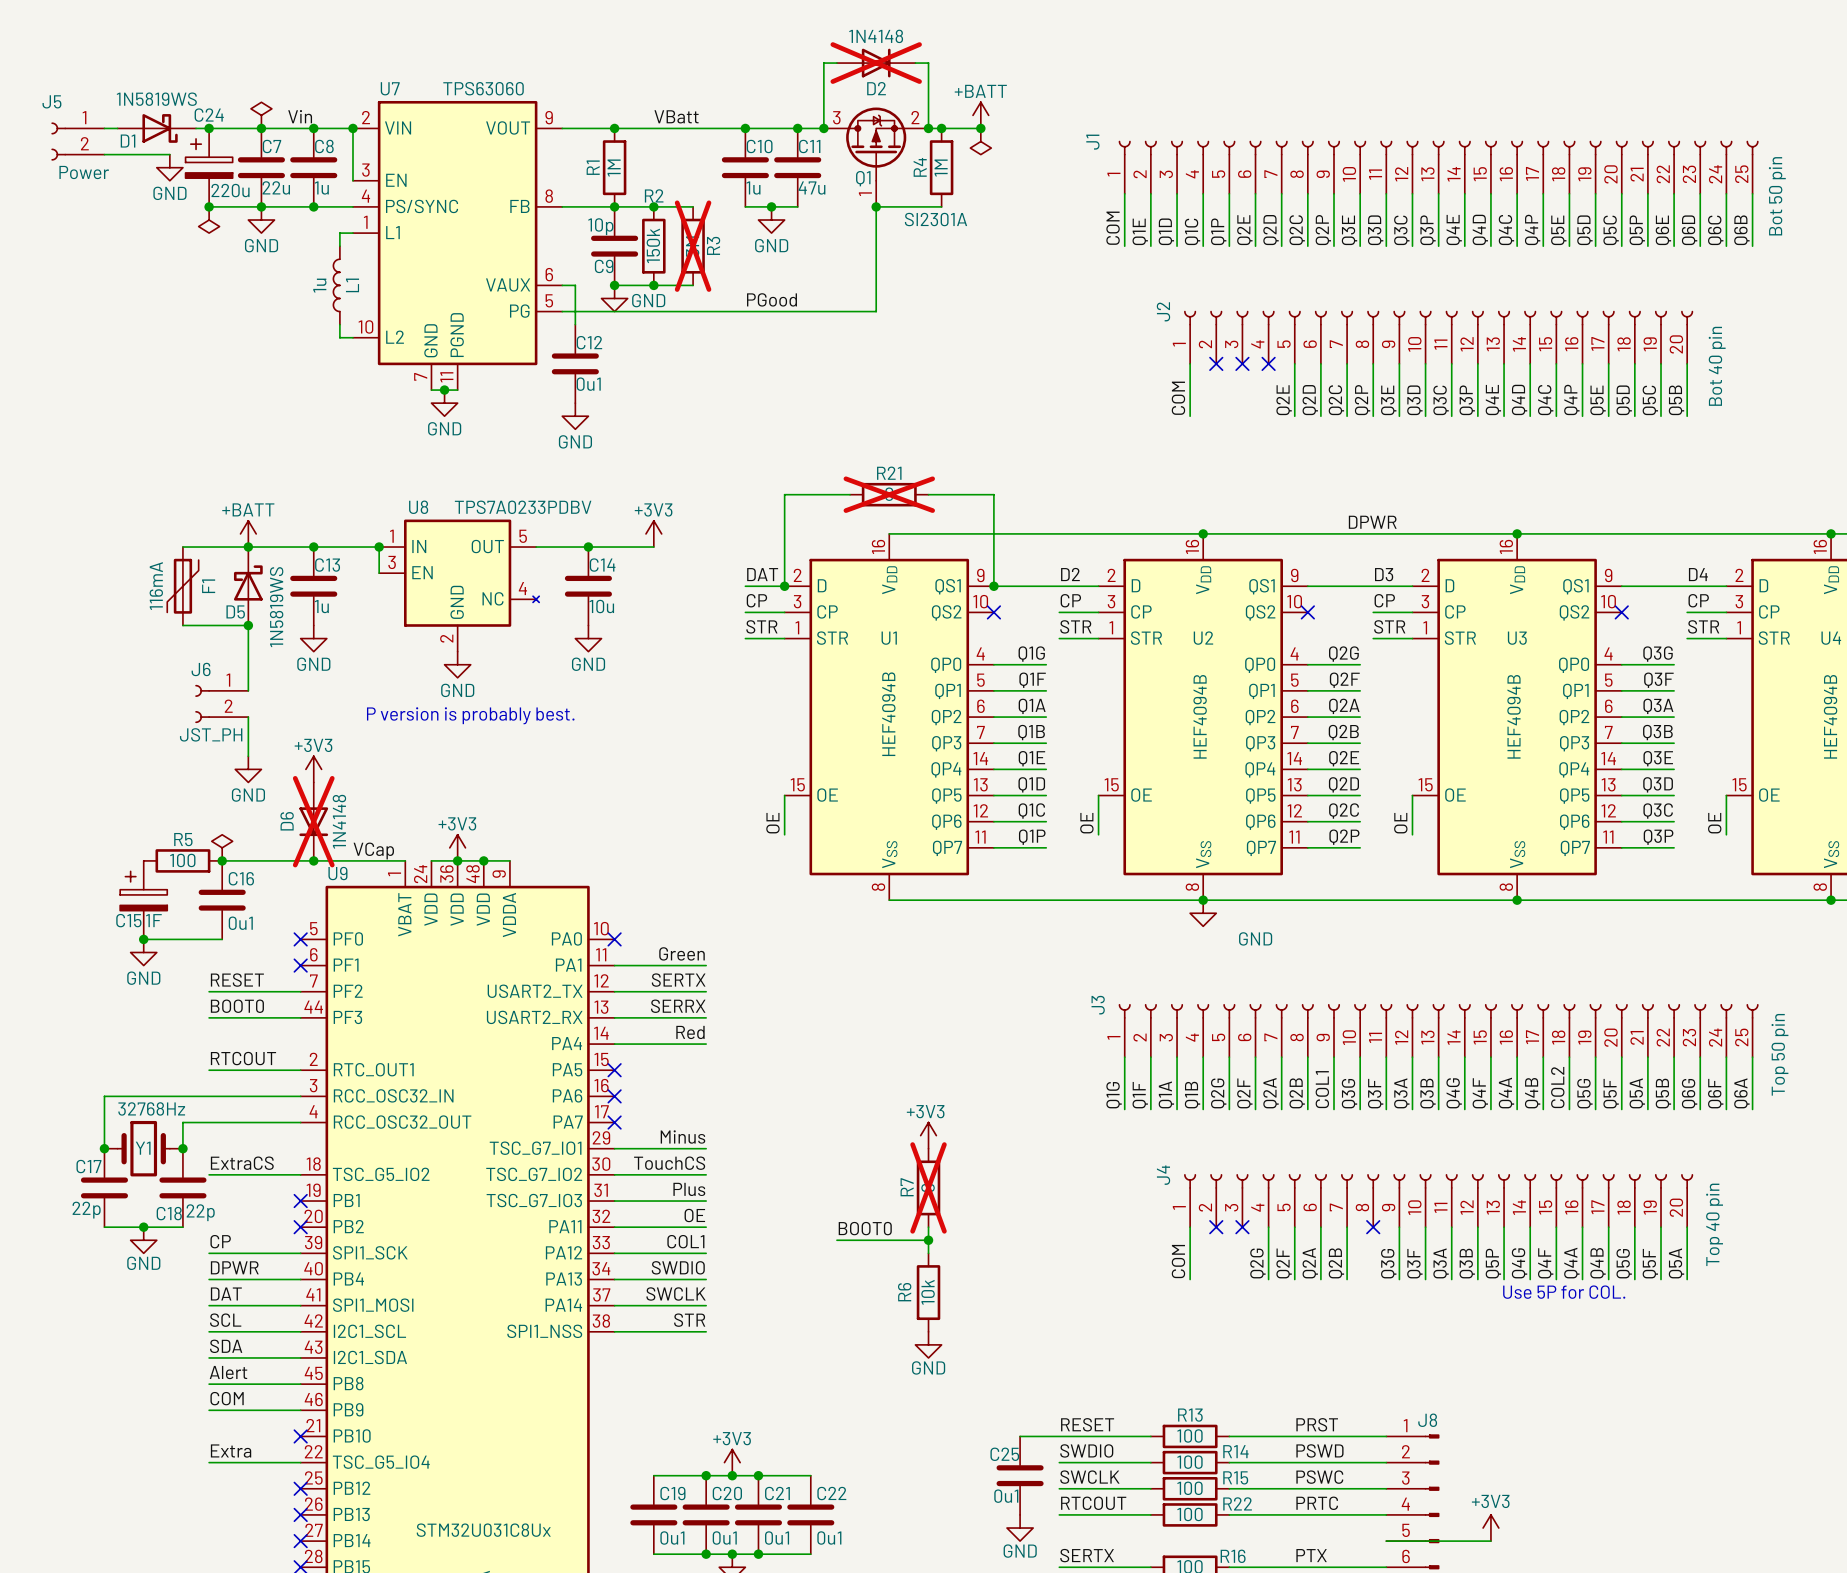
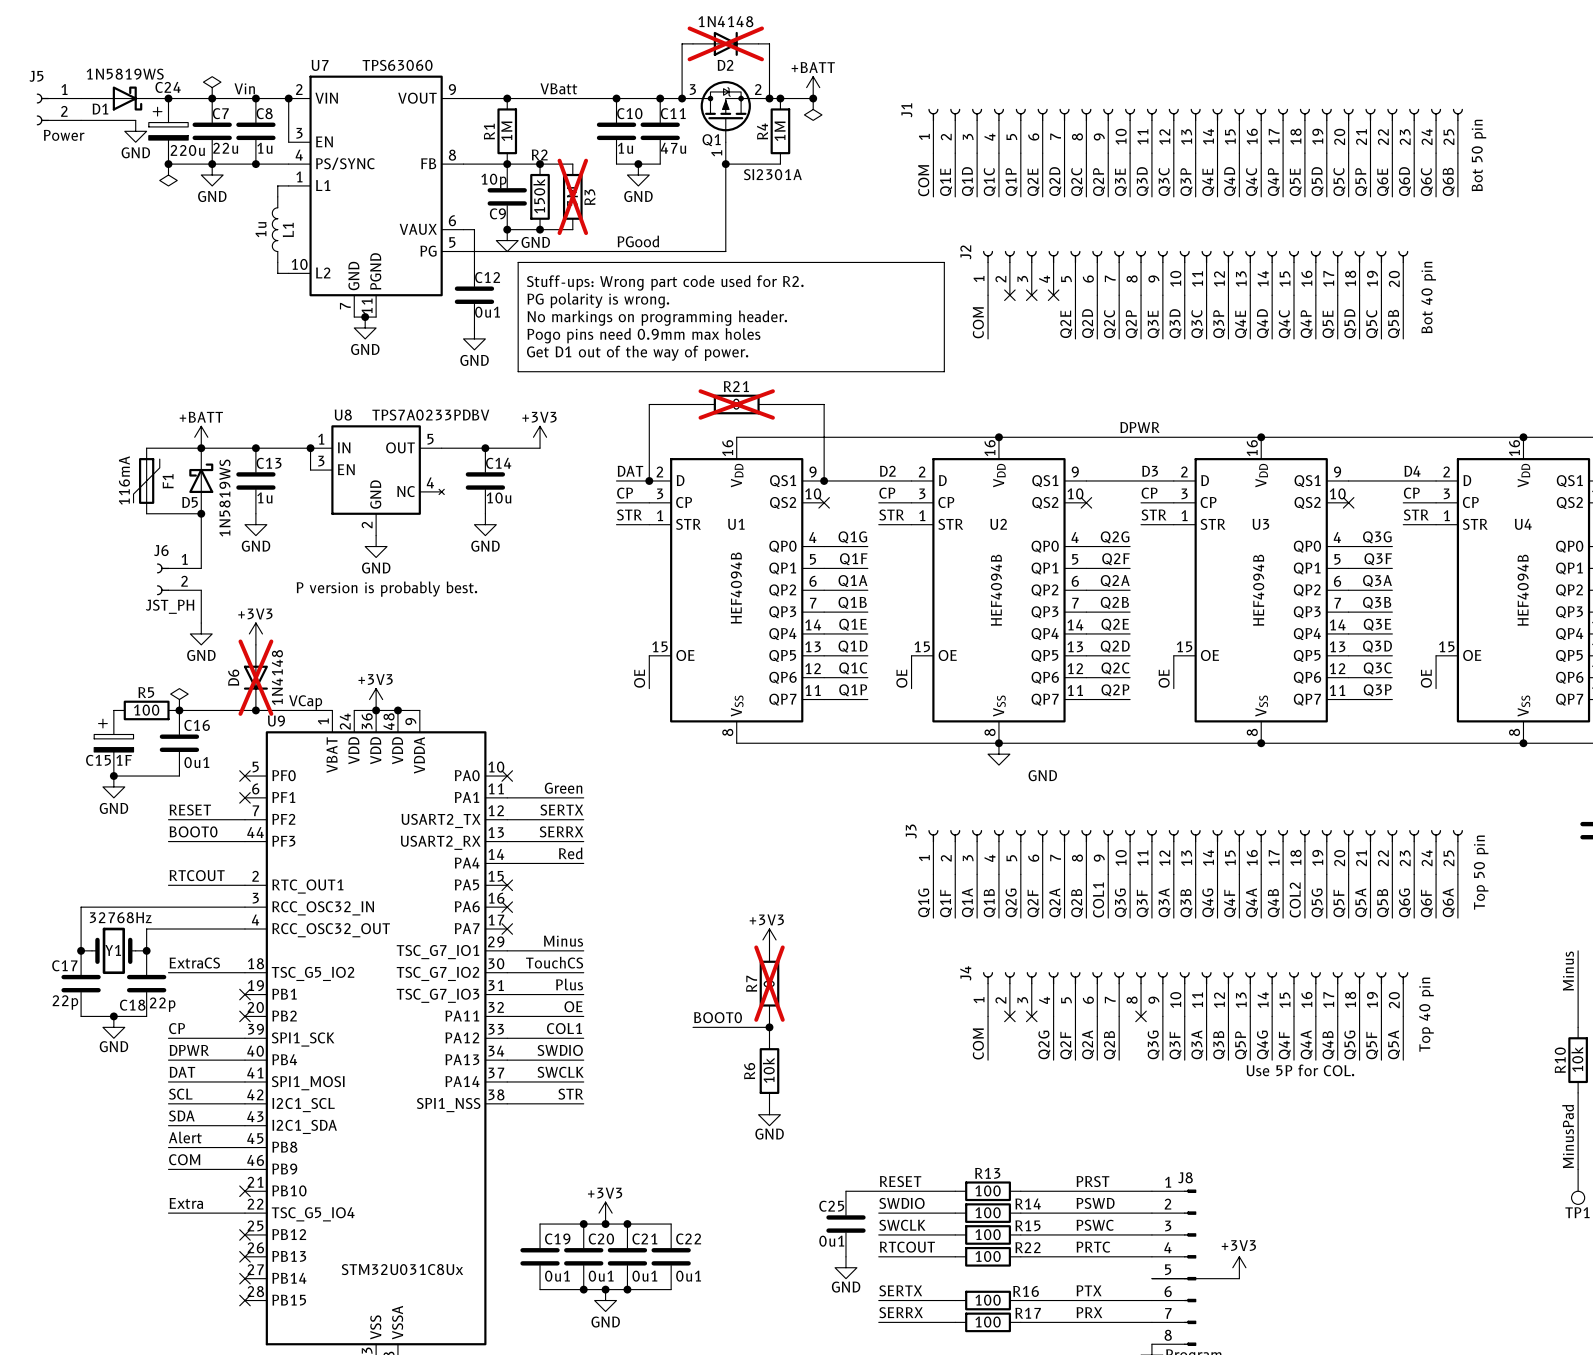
line: none -> (518, 262) (944, 262) (944, 371) (518, 371) (518, 262)
text: none -> Stuff-ups: Wrong part code used for R2. (665, 282)
text: none -> PG polarity is wrong. (598, 300)
text: none -> No markings on programming header. (657, 318)
text: none -> Pogo pins need 0.9mm max holes (643, 335)
text: none -> Get D1 out of the way of power. (637, 353)

